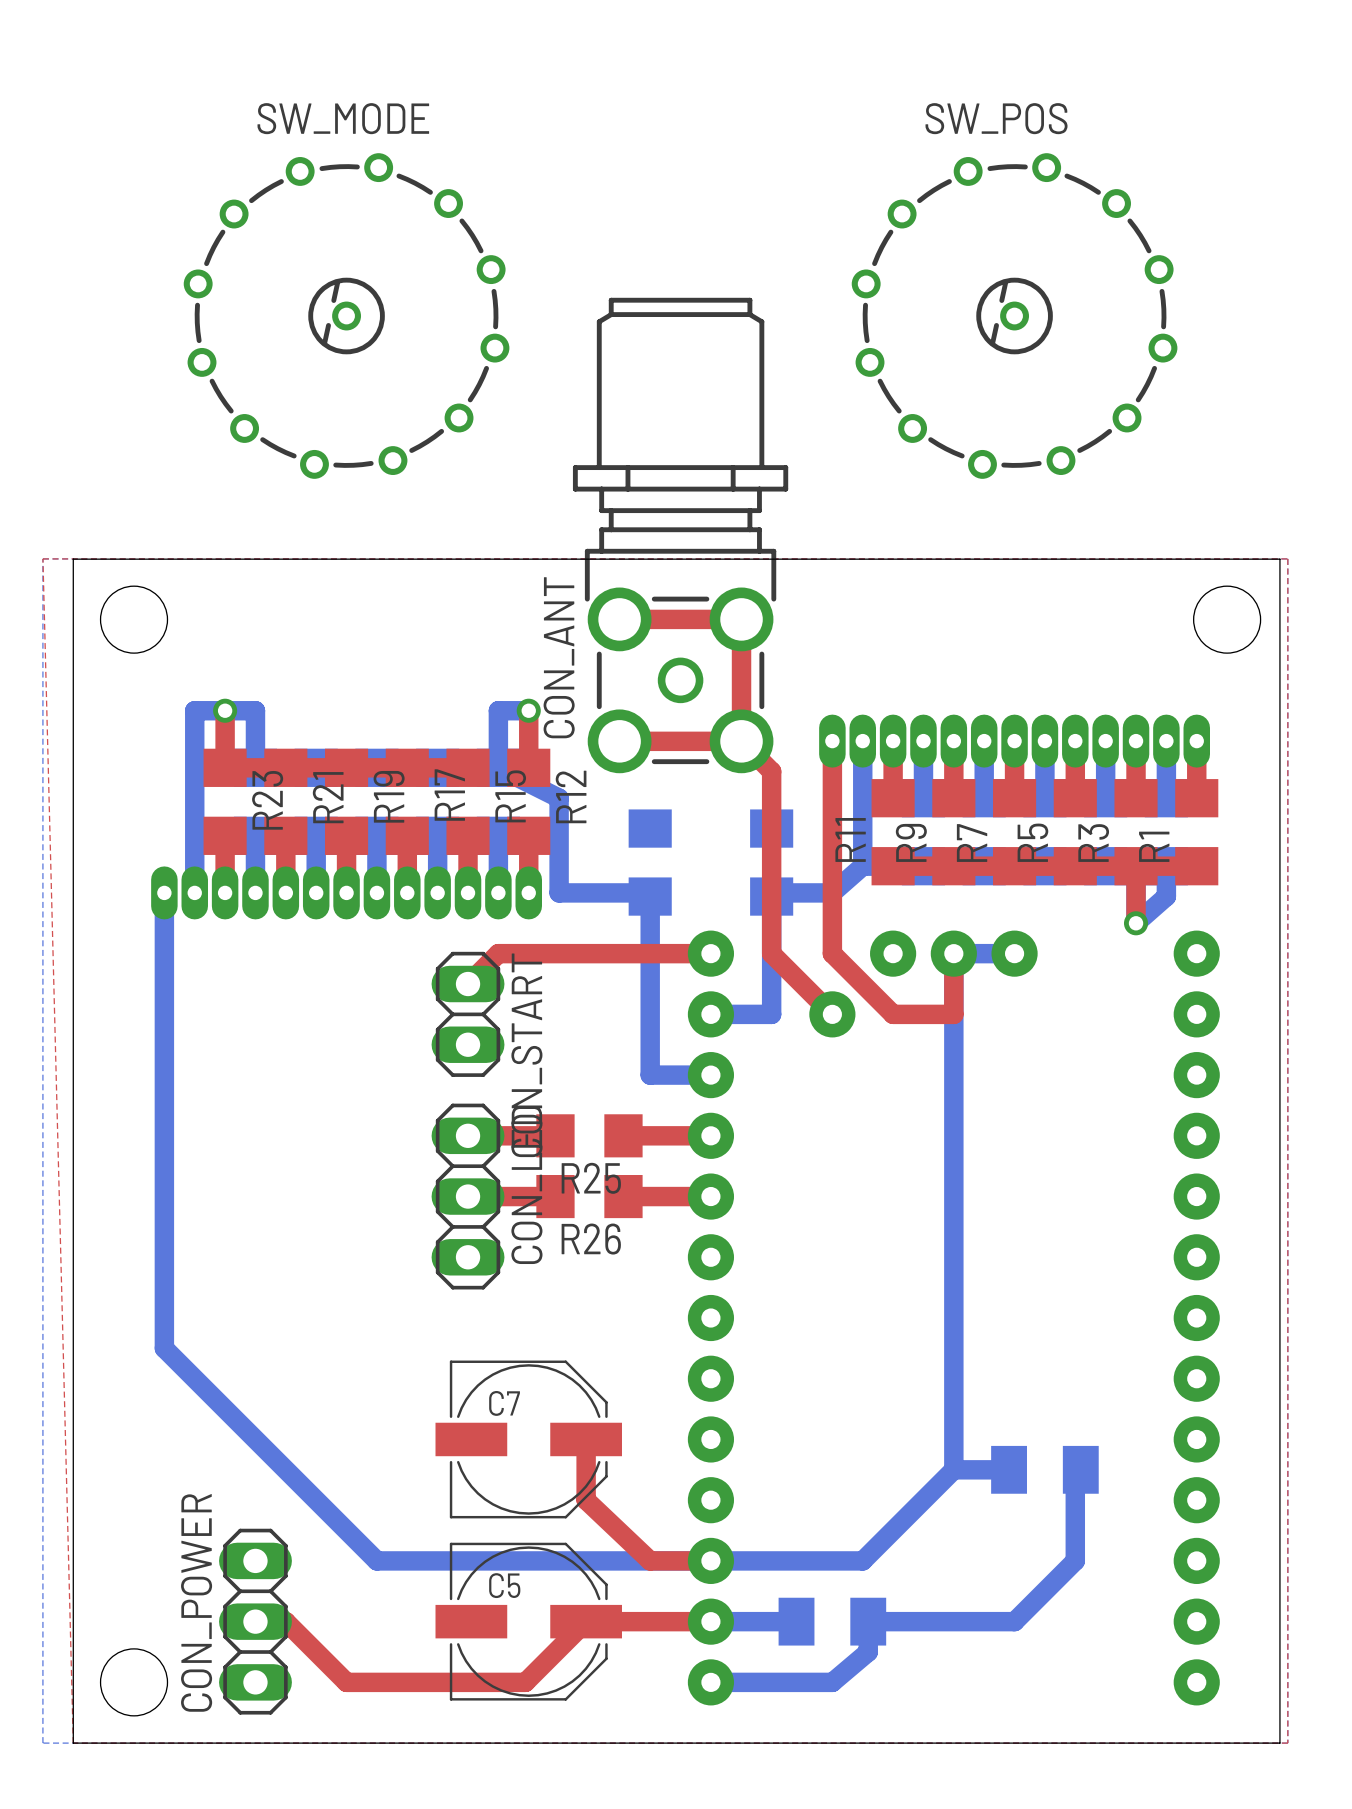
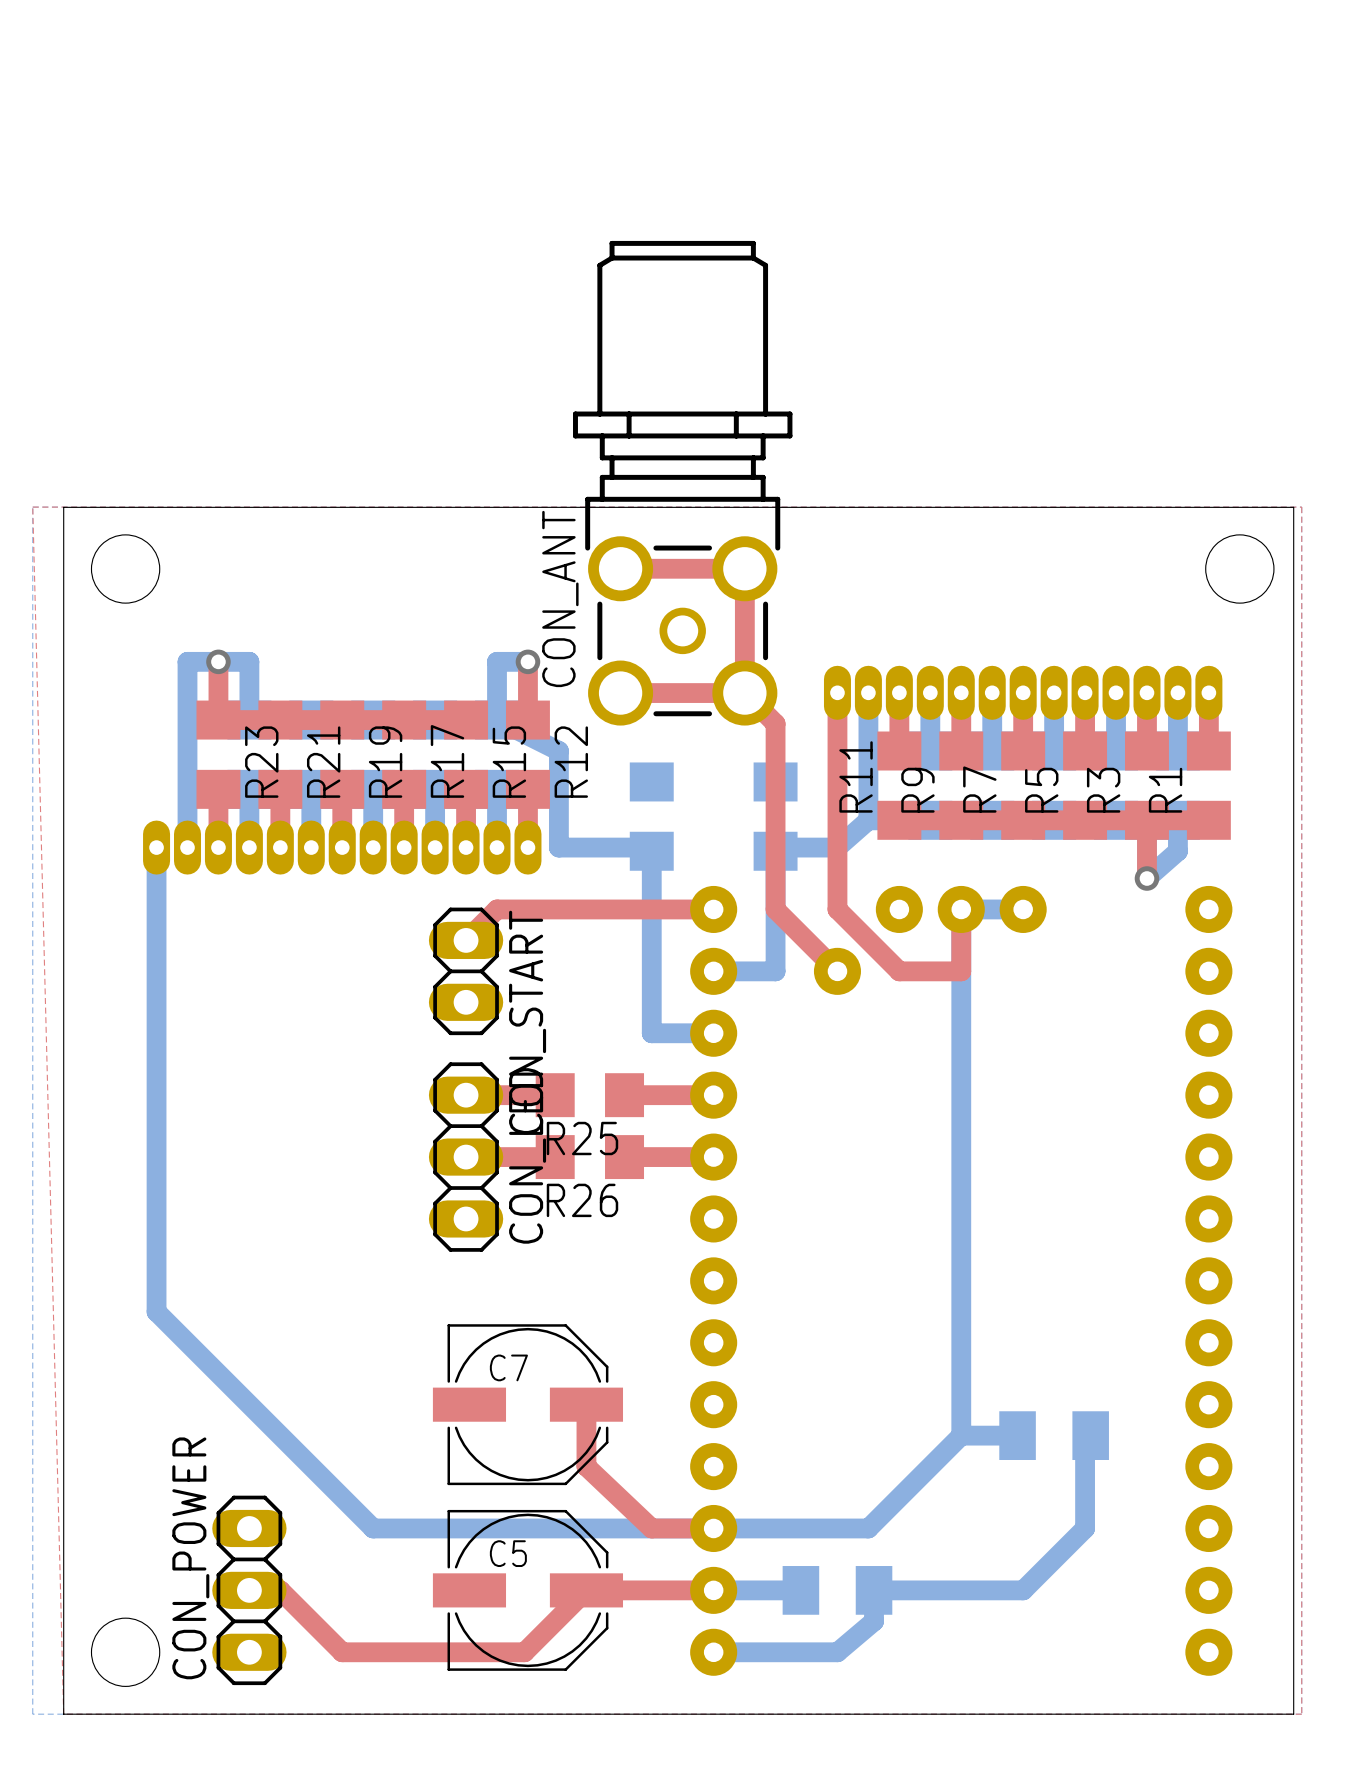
SW_MODE: (346, 316) -> none
SW_POS: (1014, 316) -> none

